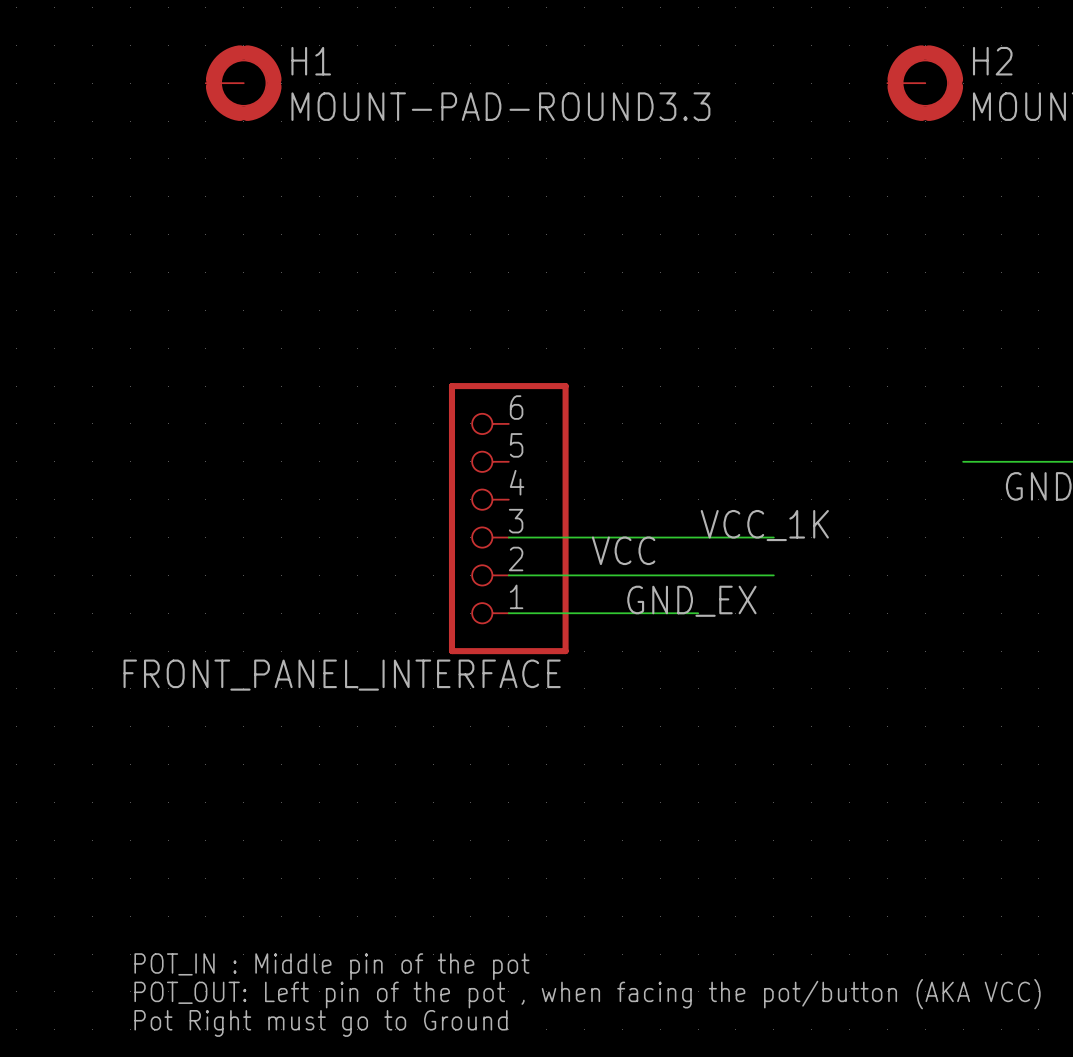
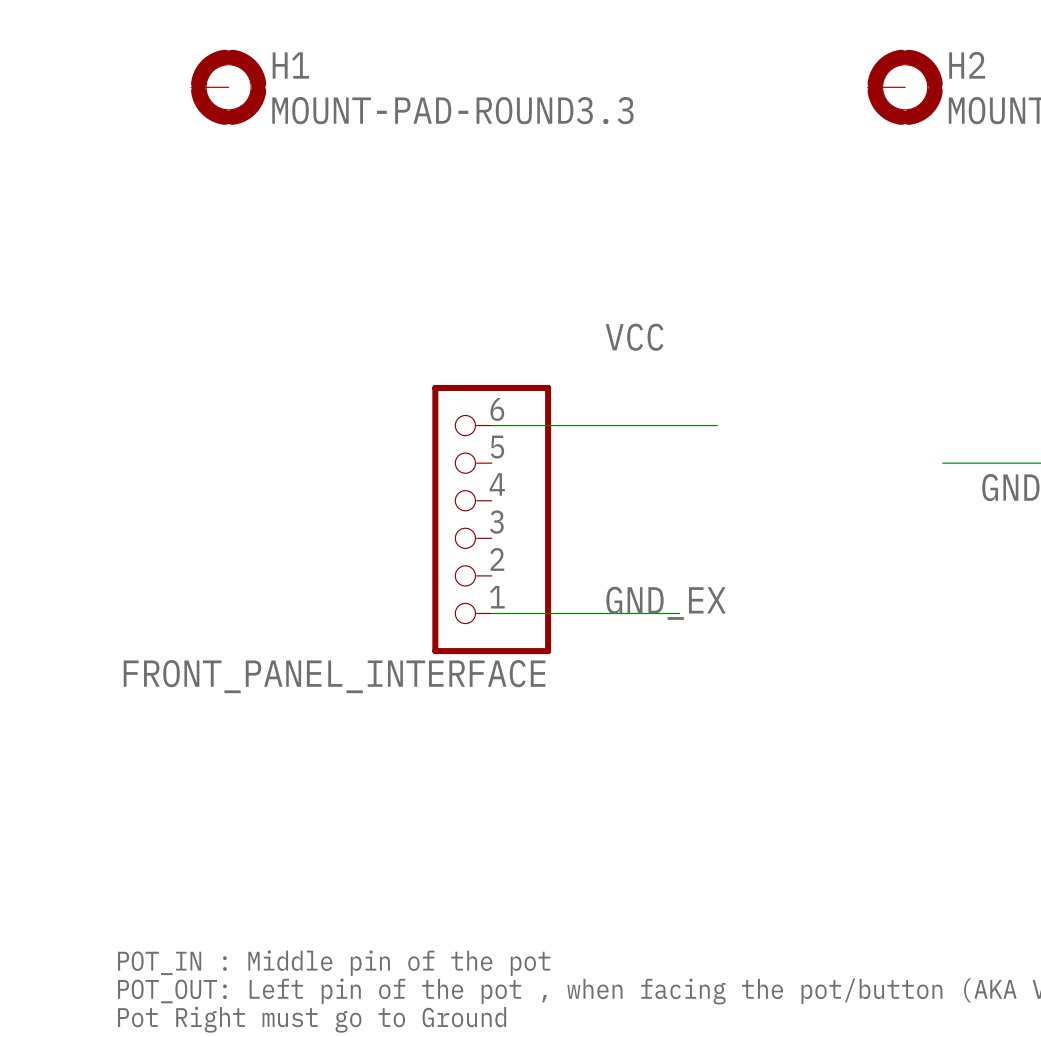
wire: none -> (491, 425) (717, 425)
label: VCC_1K (764, 525) -> none
wire: (508, 537) (773, 537) -> none
label position: VCC (623, 550) -> VCC (634, 337)
wire: (508, 575) (773, 575) -> none

